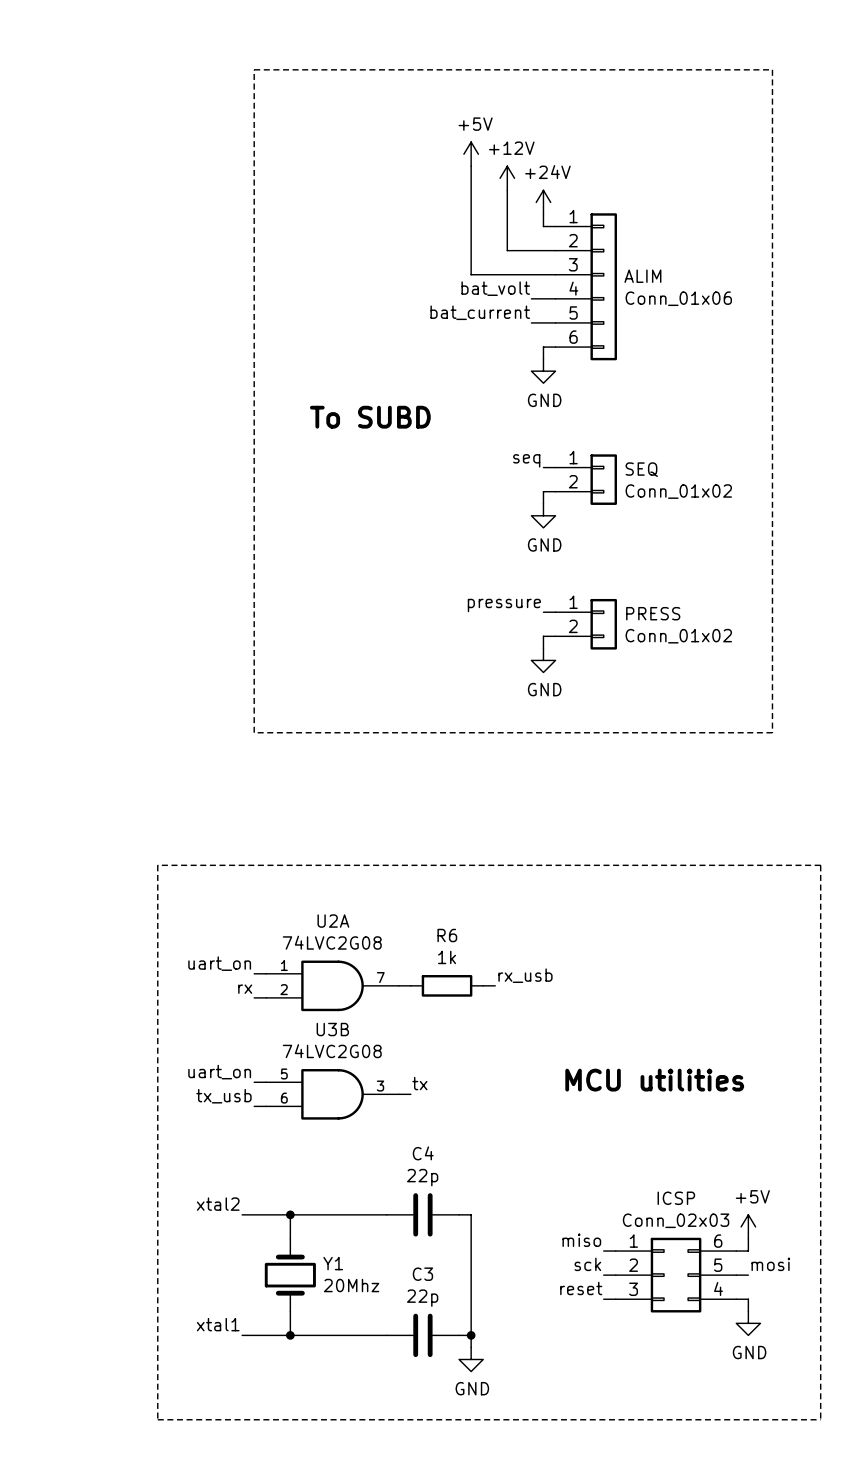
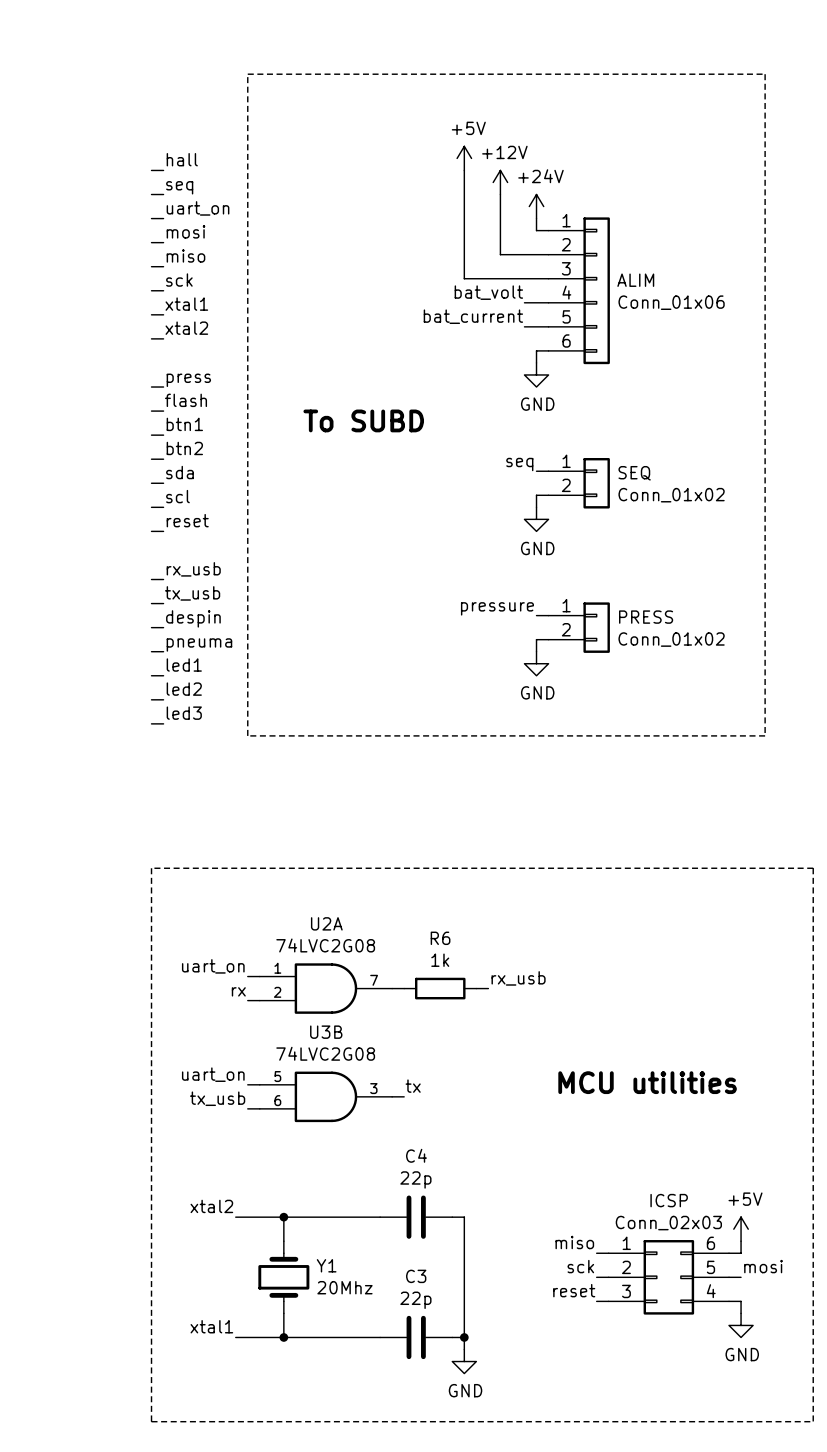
label: none -> hall (182, 159)
wire: none -> (151, 170) (163, 170)
label: none -> seq (179, 187)
wire: none -> (151, 194) (163, 194)
label: none -> uart_on (198, 208)
wire: none -> (151, 218) (163, 218)
label: none -> mosi (185, 231)
wire: none -> (151, 242) (163, 242)
label: none -> miso (185, 255)
wire: none -> (151, 266) (163, 266)
label: none -> sck (179, 280)
wire: none -> (151, 290) (163, 290)
label: none -> xtal1 (186, 304)
wire: none -> (151, 314) (163, 314)
label: none -> xtal2 (186, 328)
wire: none -> (151, 338) (163, 338)
label: none -> press (188, 380)
wire: none -> (151, 387) (163, 387)
label: none -> flash (185, 400)
wire: none -> (151, 411) (163, 411)
label: none -> btn1 (184, 424)
wire: none -> (151, 435) (163, 435)
label: none -> btn2 (184, 448)
wire: none -> (151, 459) (163, 459)
label: none -> sda (179, 472)
wire: none -> (151, 483) (163, 483)
label: none -> scl (177, 496)
wire: none -> (151, 507) (163, 507)
label: none -> reset (187, 520)
wire: none -> (151, 531) (163, 531)
label: none -> rx_usb (193, 569)
wire: none -> (151, 579) (163, 579)
label: none -> tx_usb (192, 593)
wire: none -> (151, 603) (163, 603)
label: none -> despin (193, 618)
wire: none -> (151, 627) (163, 627)
label: none -> pneuma (199, 644)
wire: none -> (151, 651) (163, 651)
label: none -> led1 (184, 665)
wire: none -> (151, 675) (163, 675)
label: none -> led2 (184, 689)
wire: none -> (151, 699) (163, 699)
label: none -> led3 (184, 713)
wire: none -> (151, 723) (163, 723)

